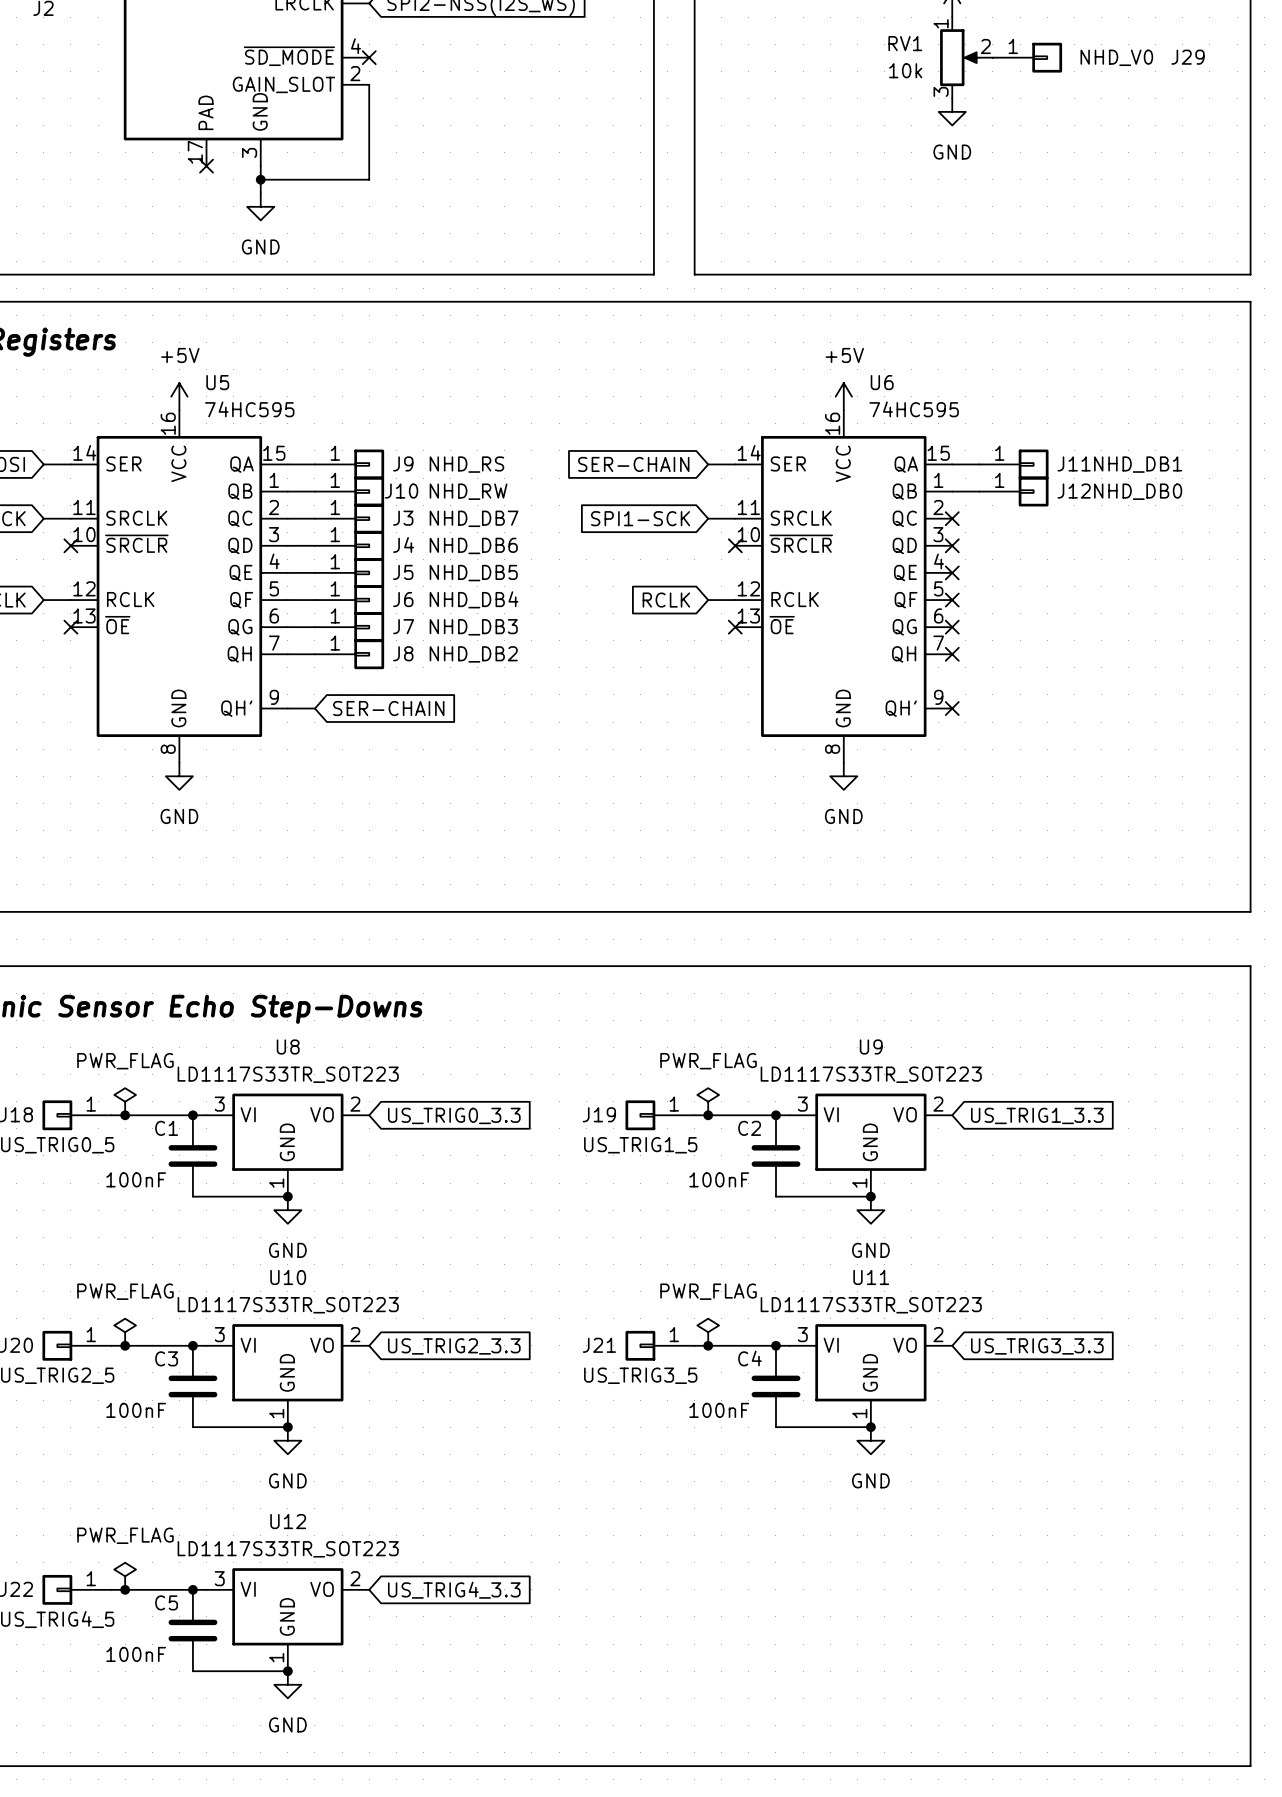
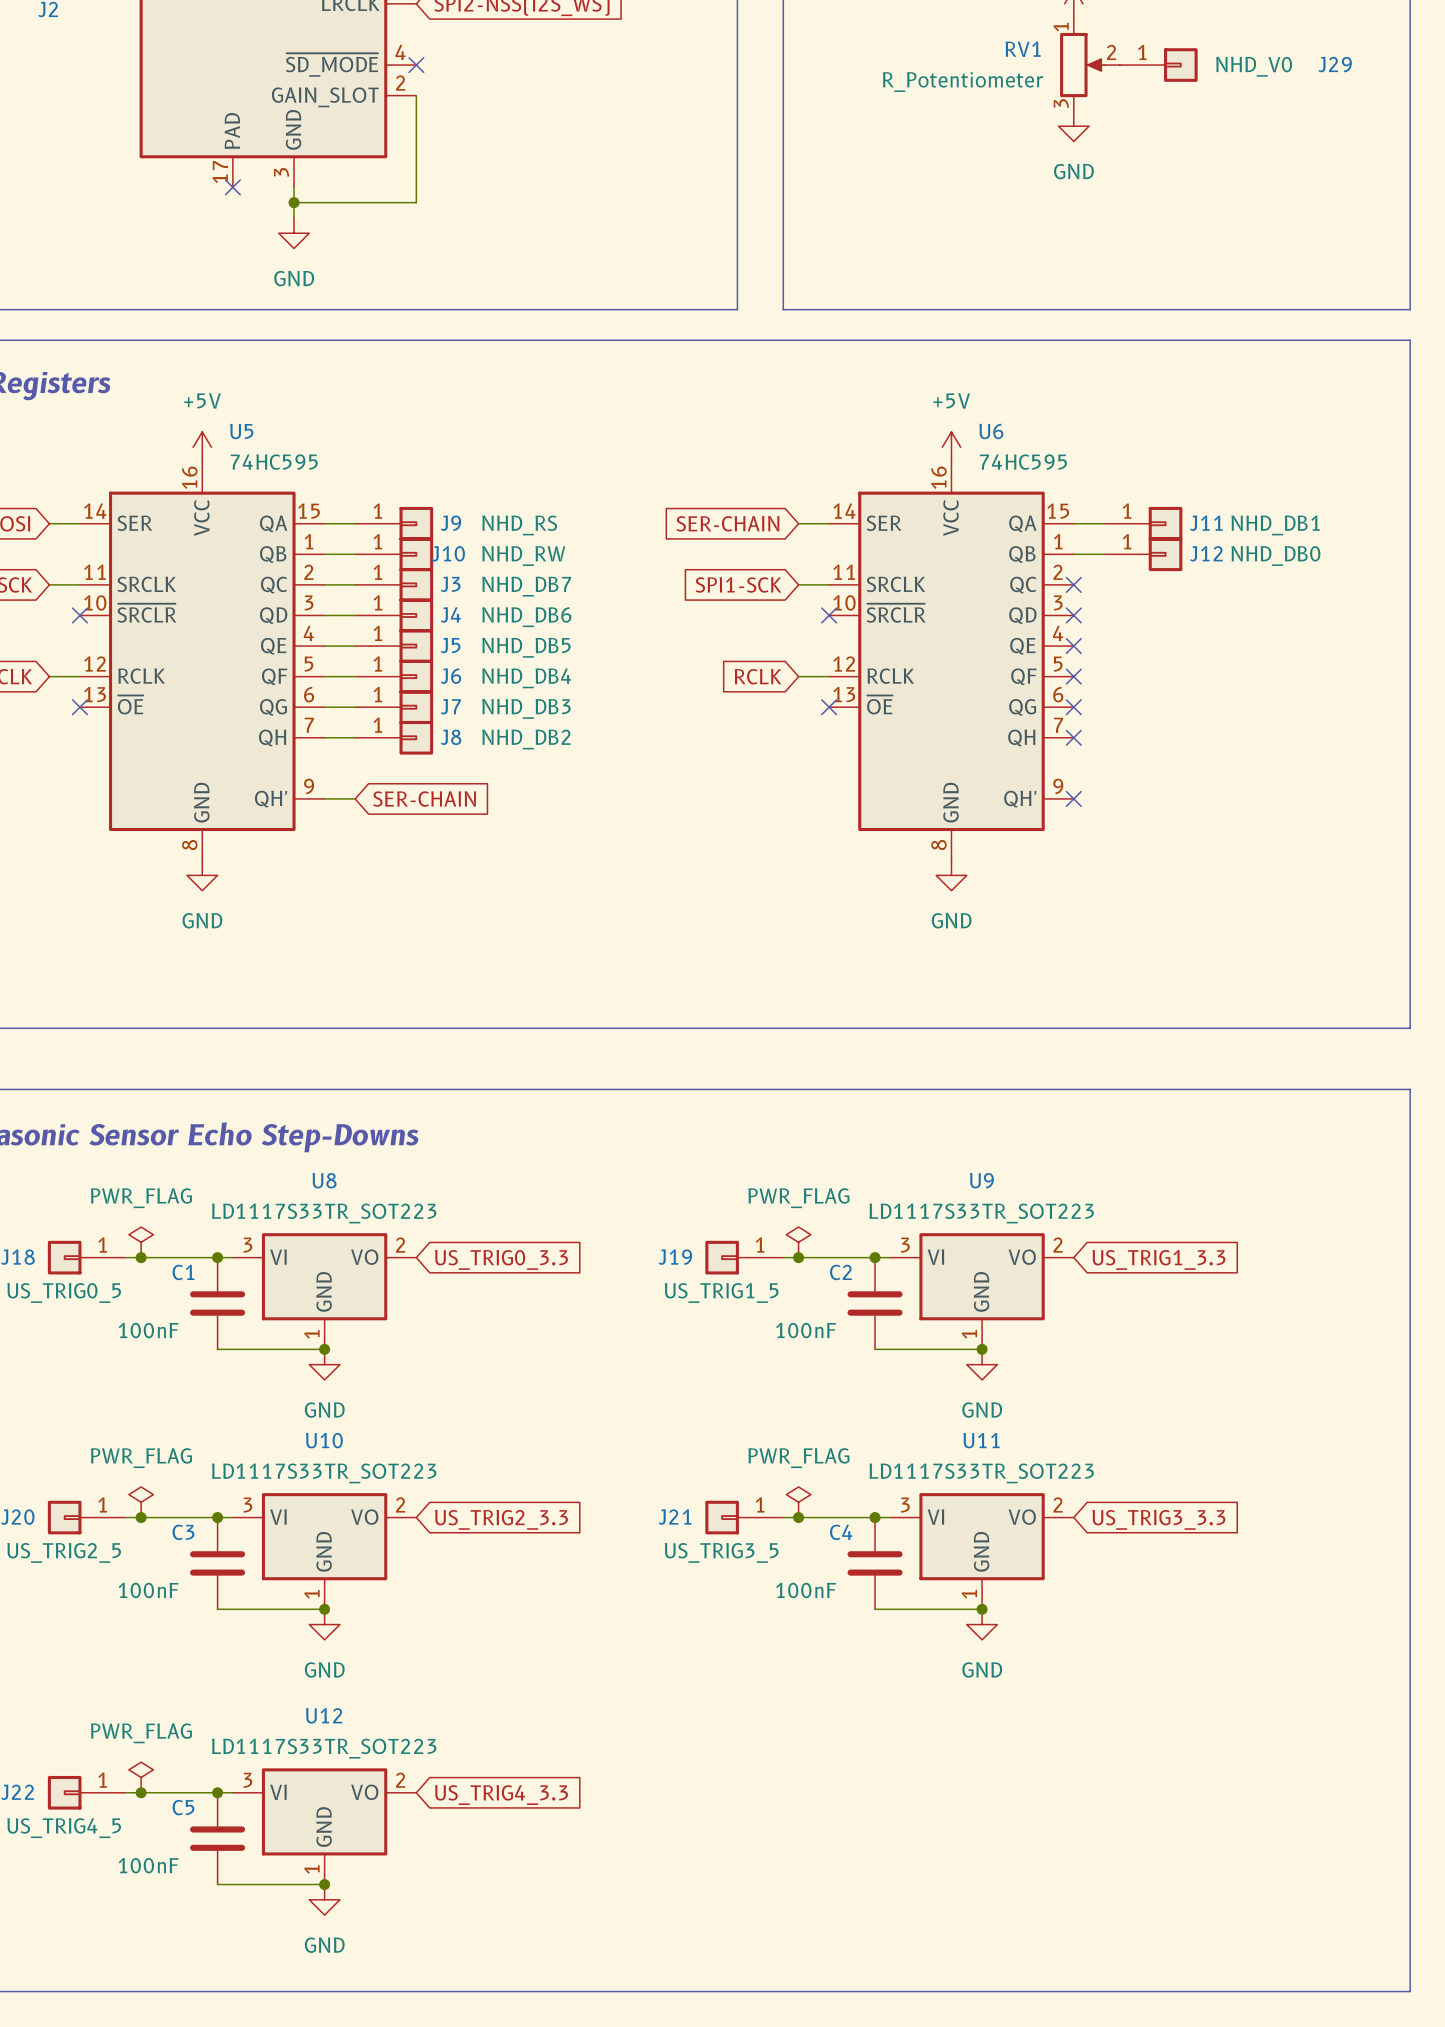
RV1 value: 10k (905, 70) -> R_Potentiometer (963, 82)

